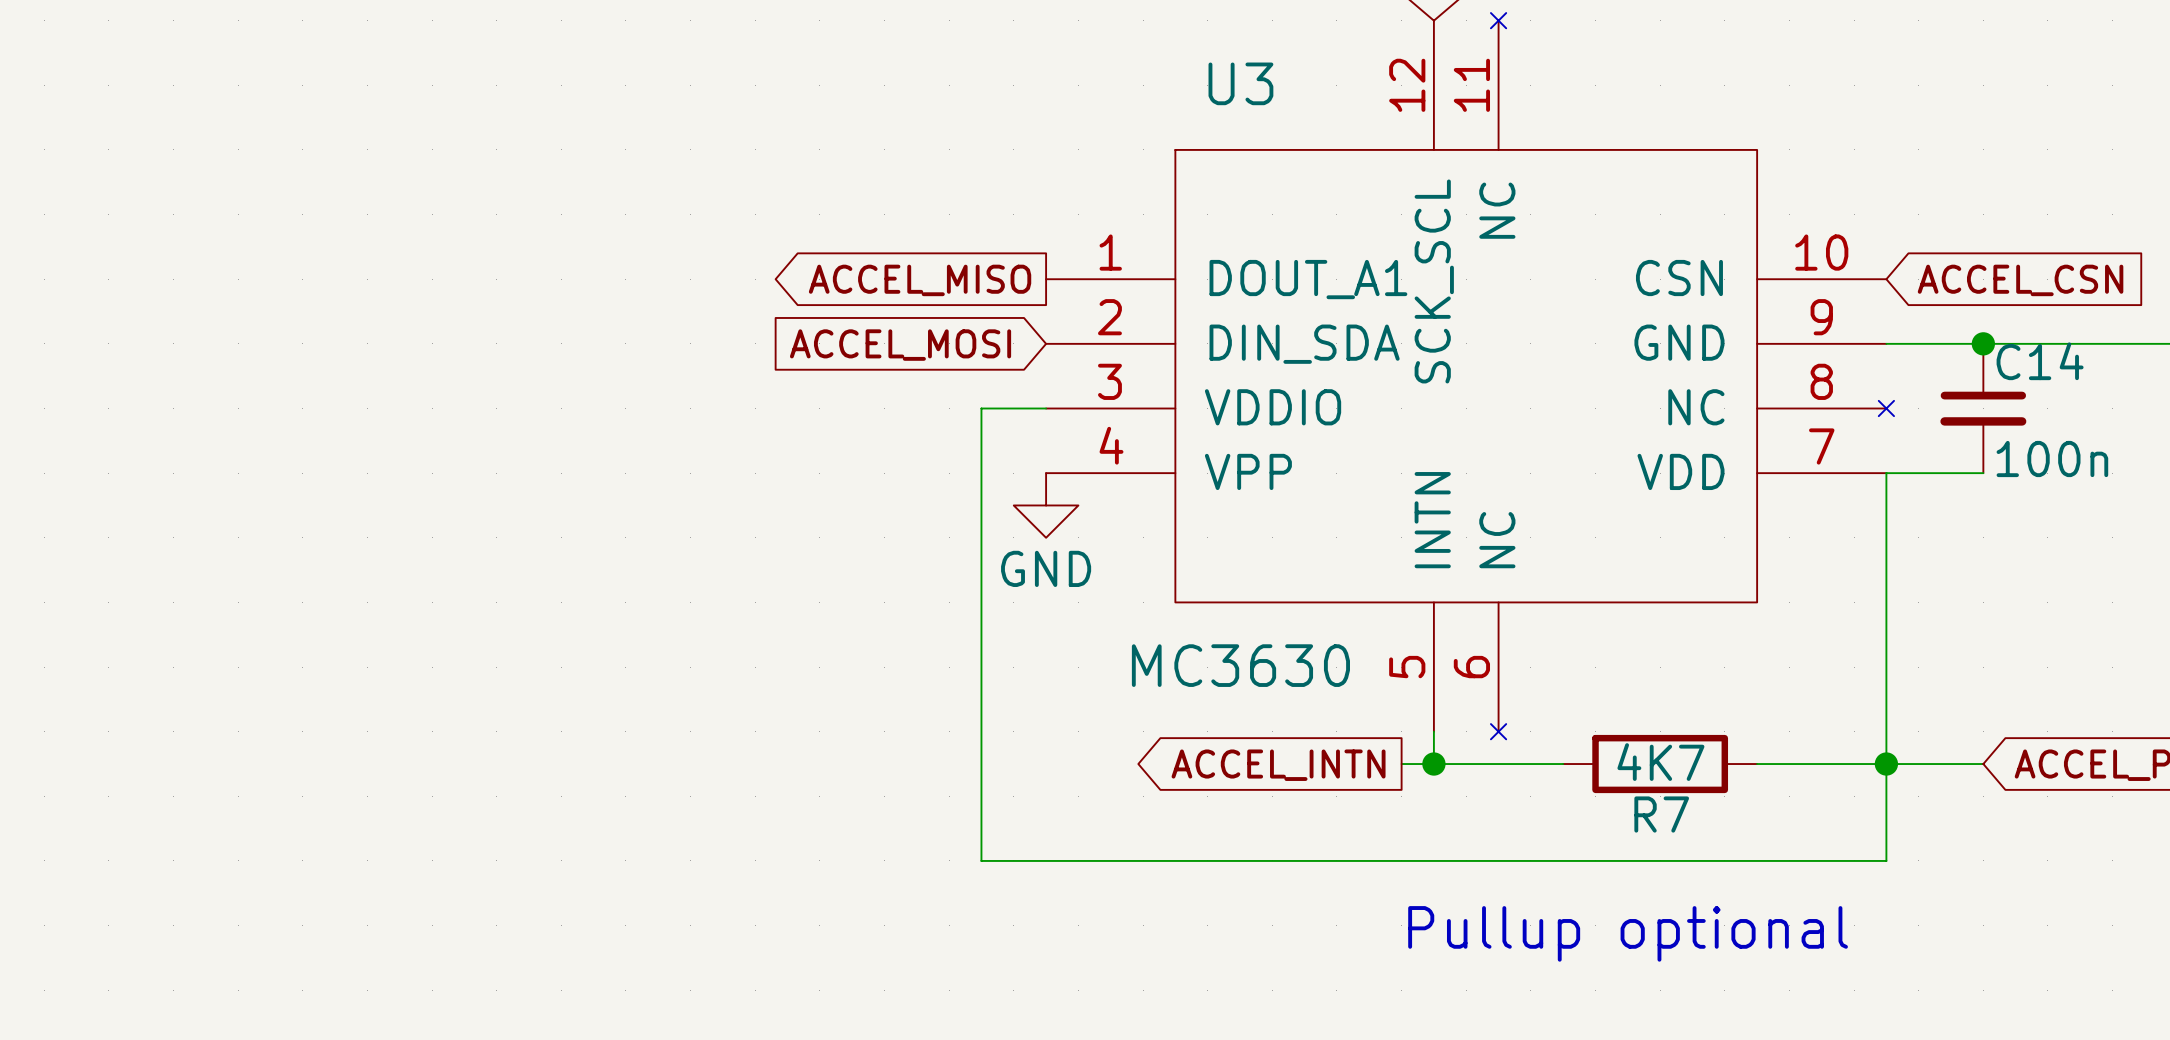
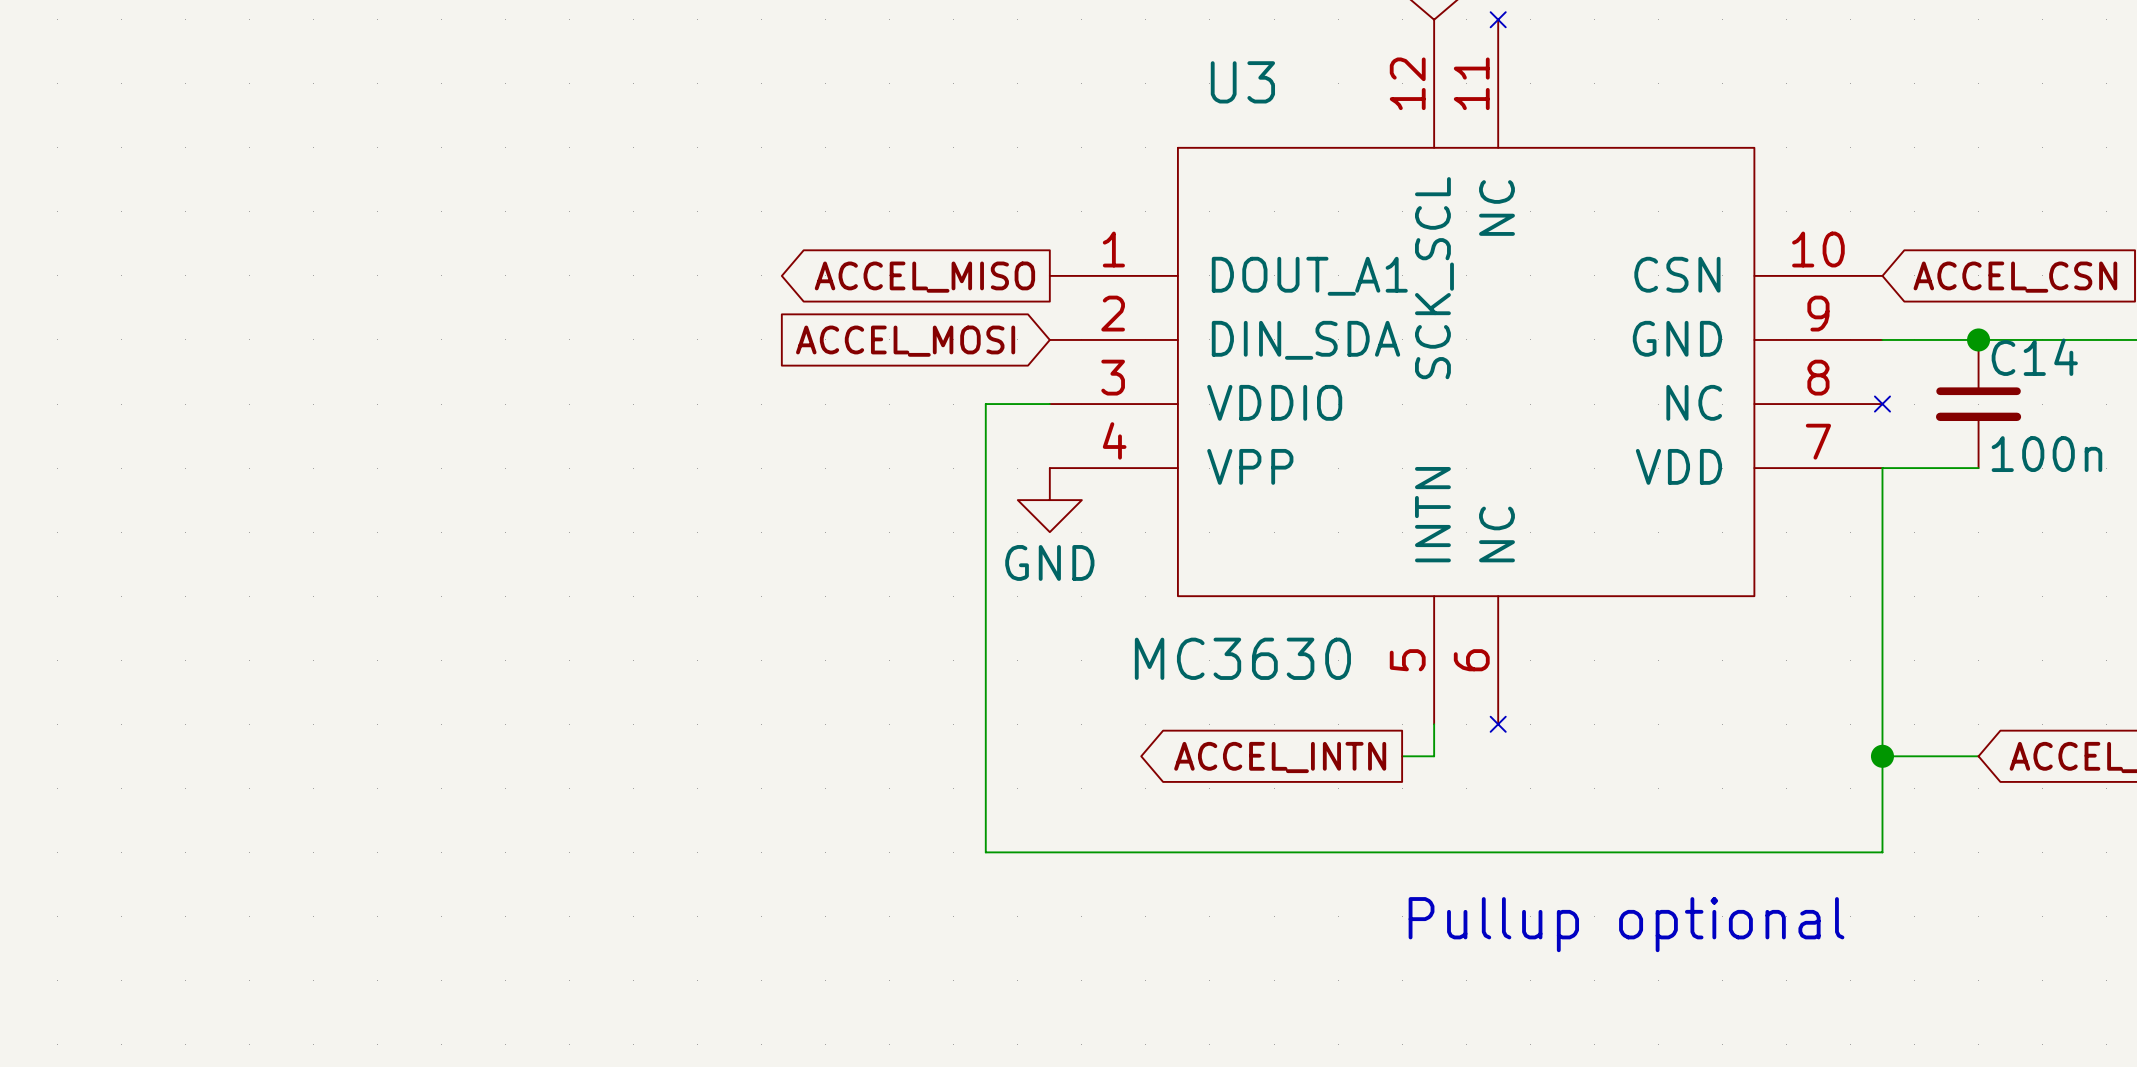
wire: (1433, 764) (1563, 764) -> none
junction: (1433, 764) -> none
R7: 4K7 (1660, 764) -> none
wire: (1757, 764) (1886, 764) -> none

